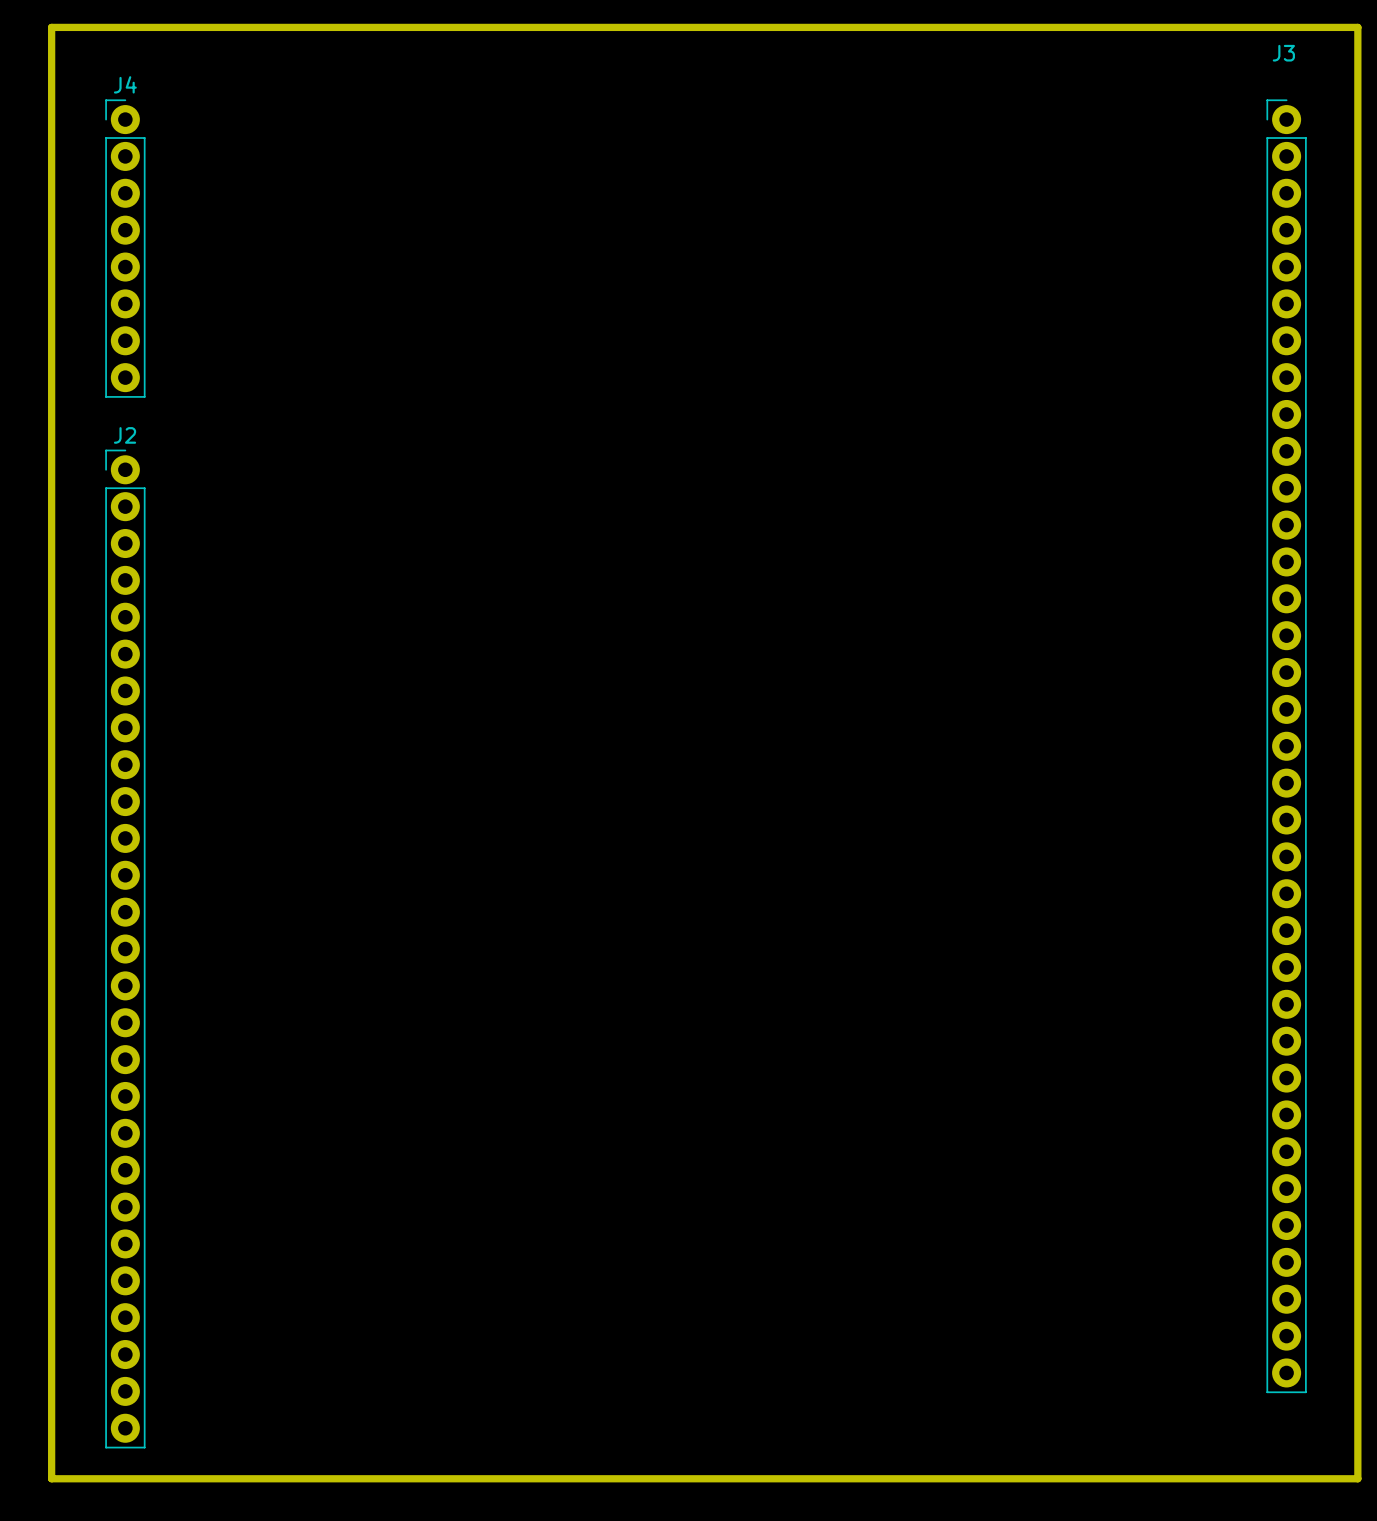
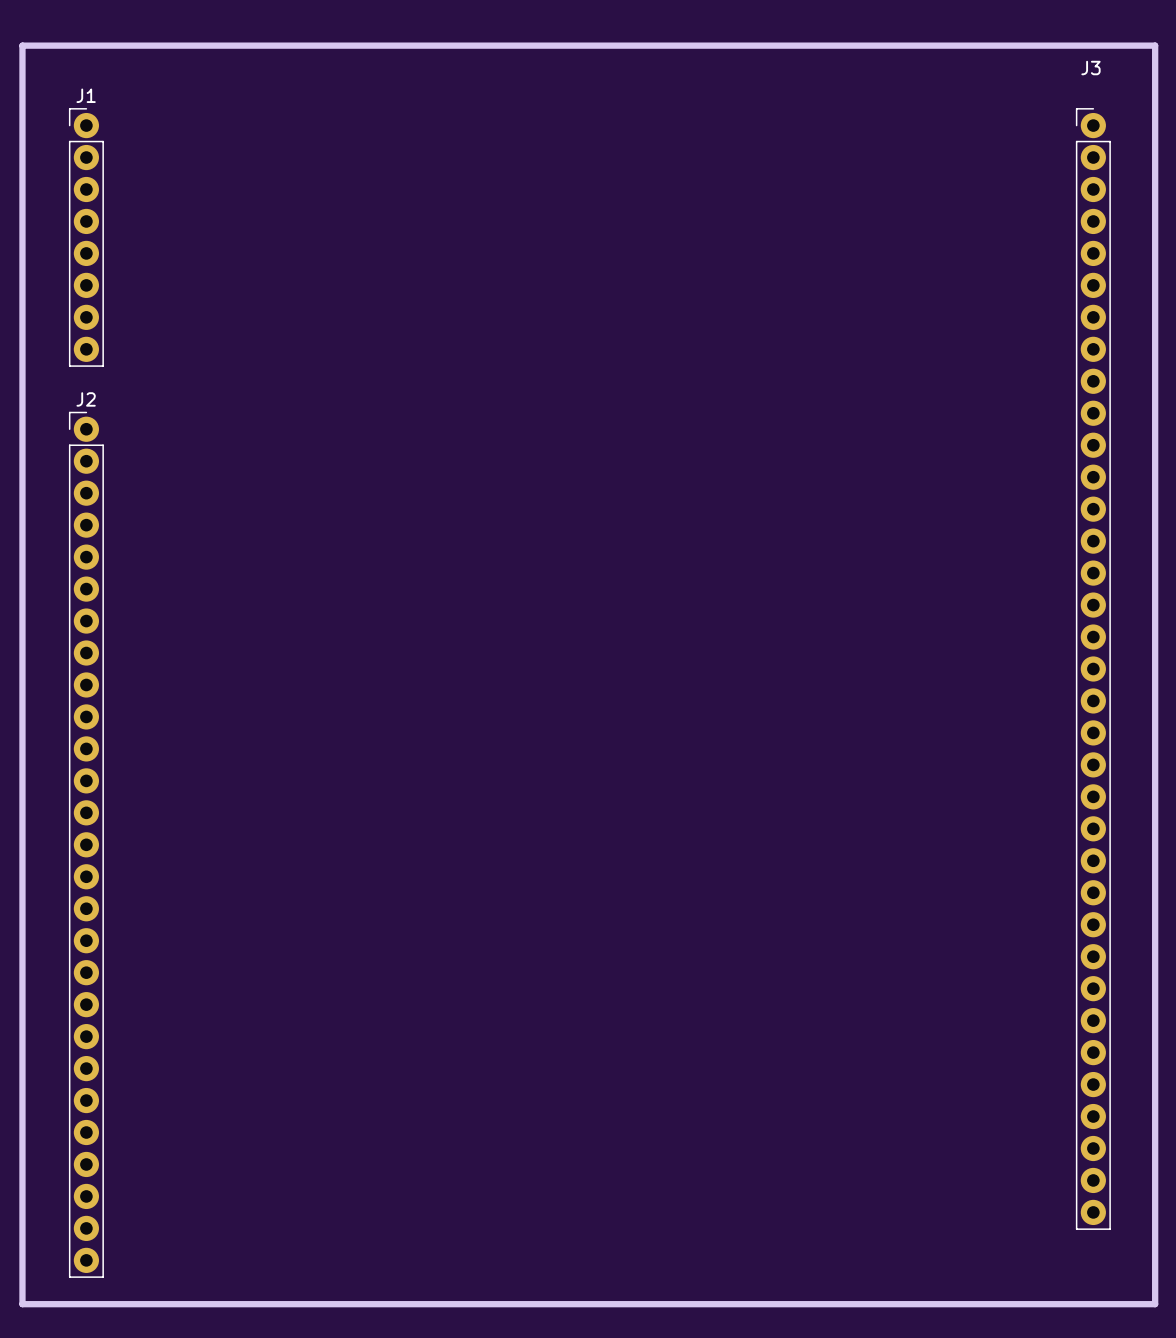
J4 name: J4 (125, 84) -> J1 (86, 95)

